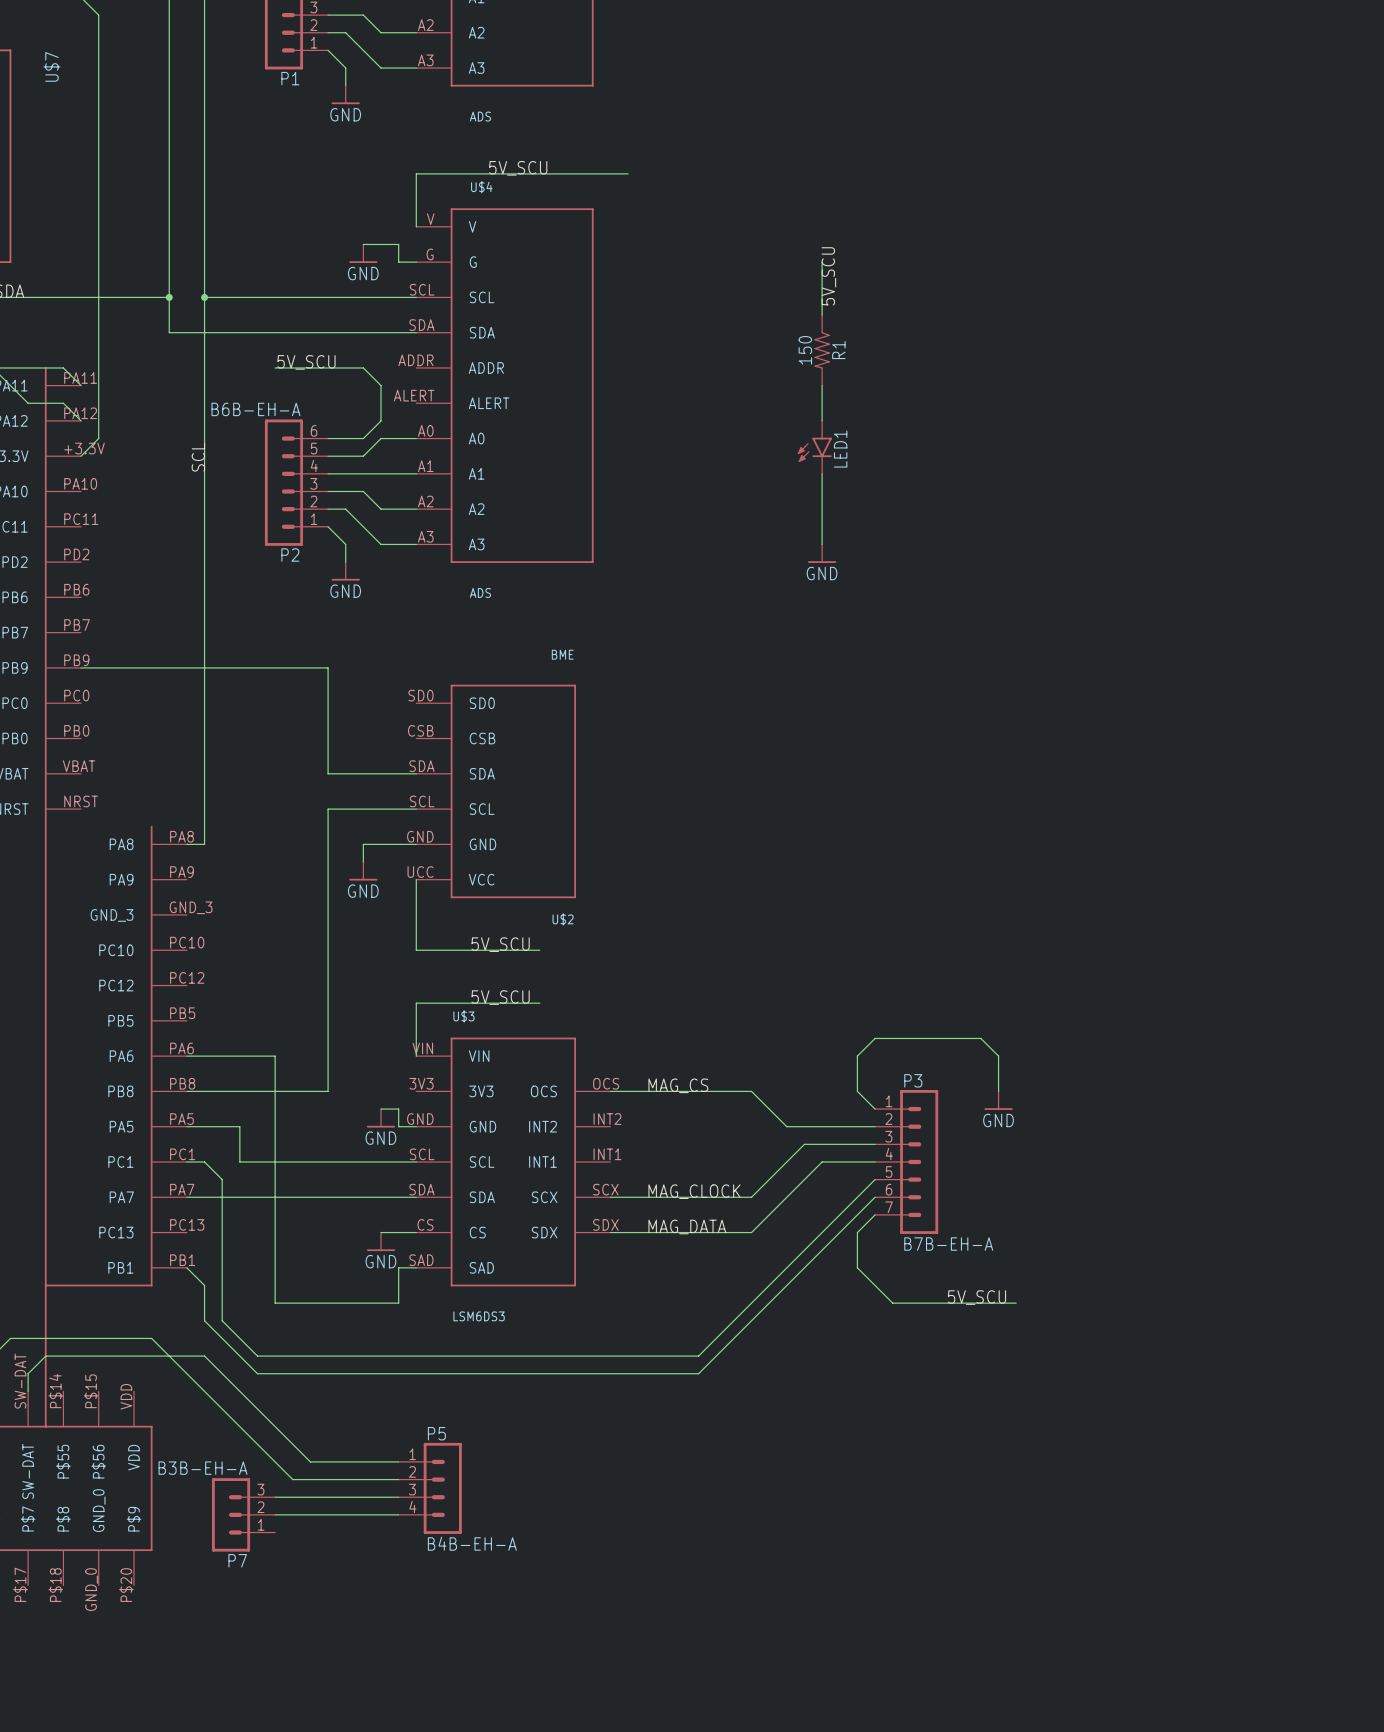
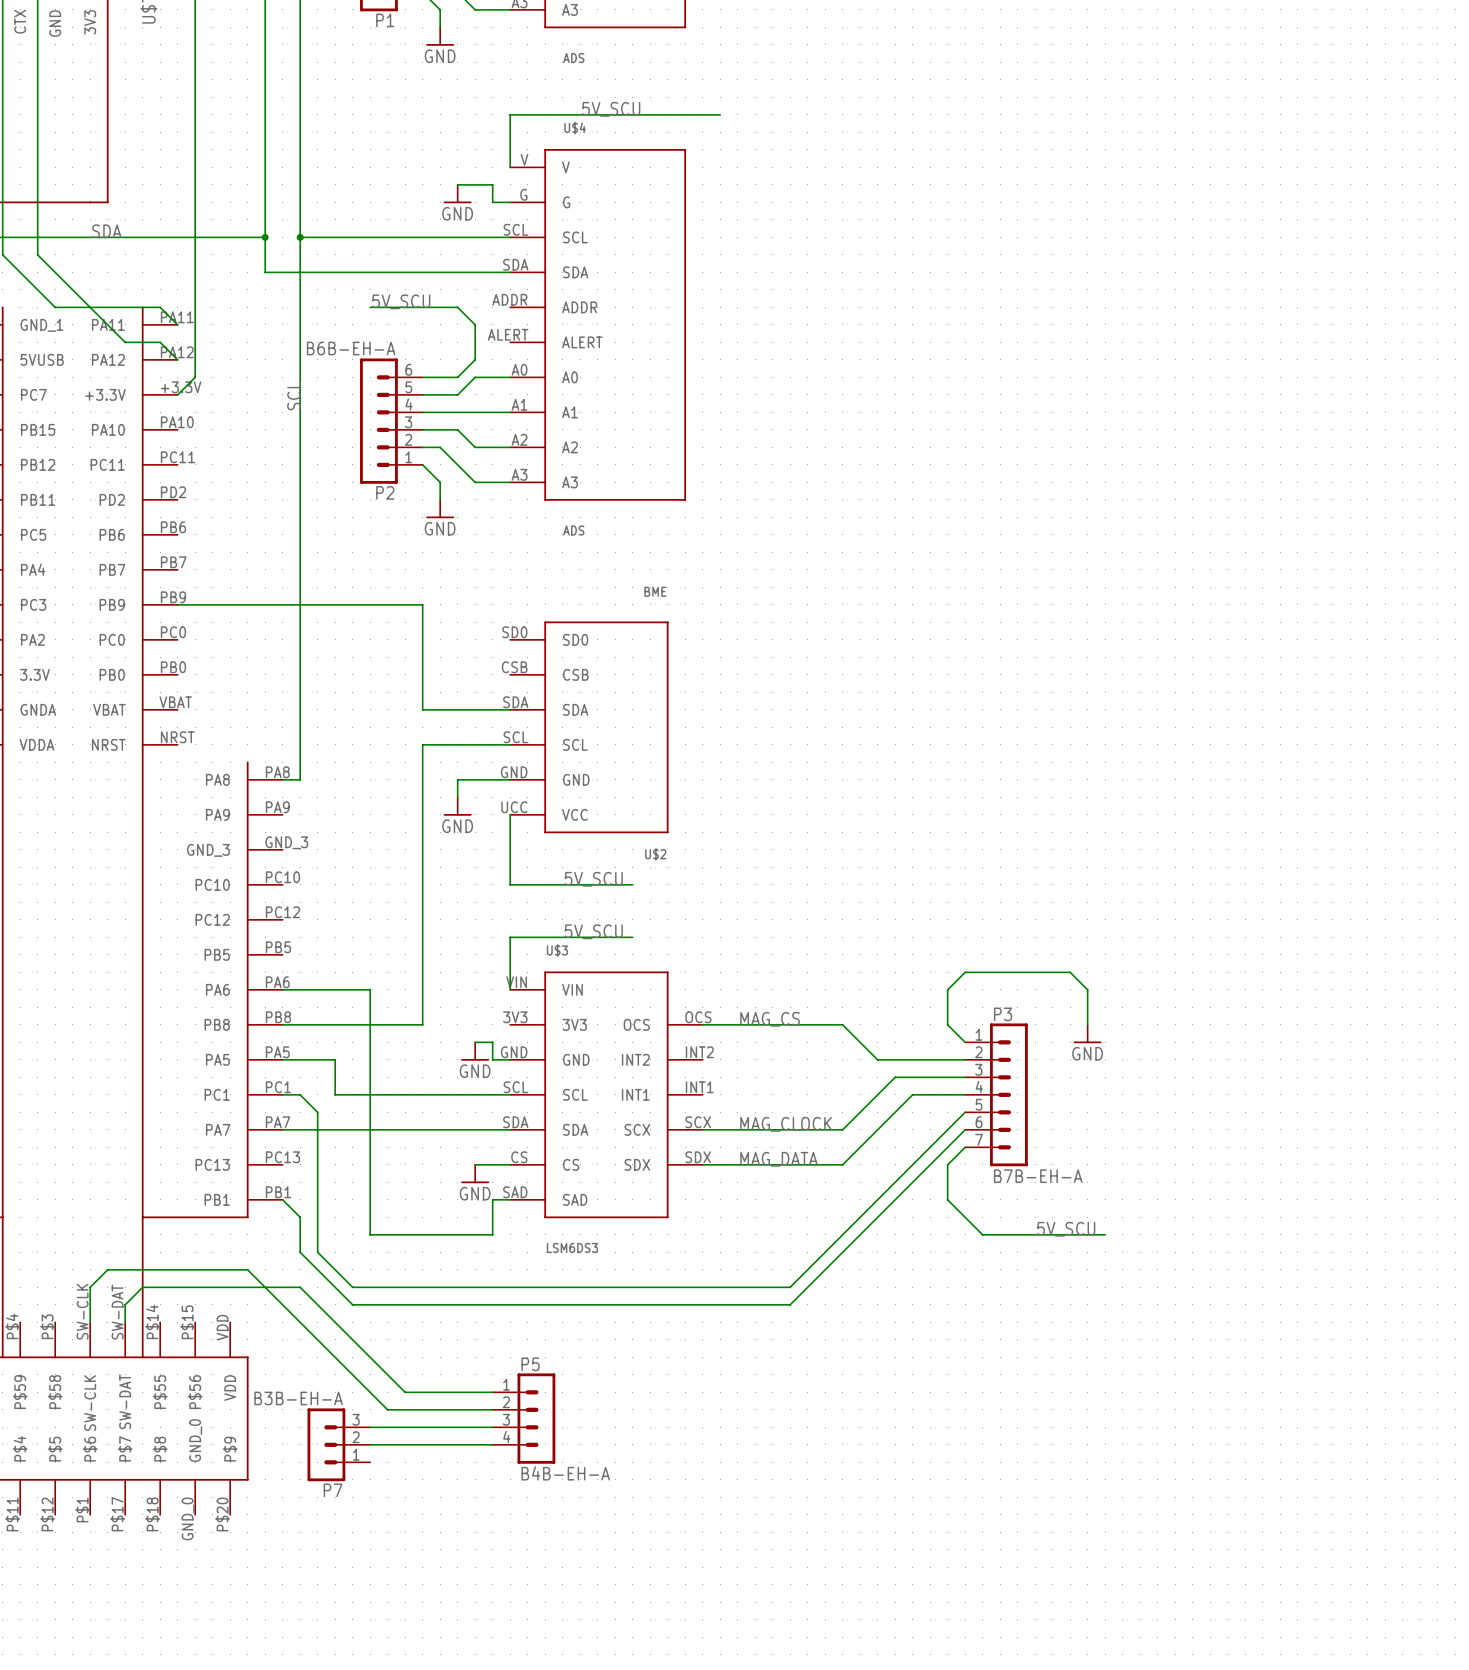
wire: (822, 262) (822, 315) -> none
label: 5V_SCU (828, 276) -> none
R1: 150 (822, 350) -> none
wire: (822, 385) (822, 420) -> none
LED1: (814, 447) -> none
wire: (822, 473) (822, 544) -> none
power symbol: GND (822, 553) -> none

